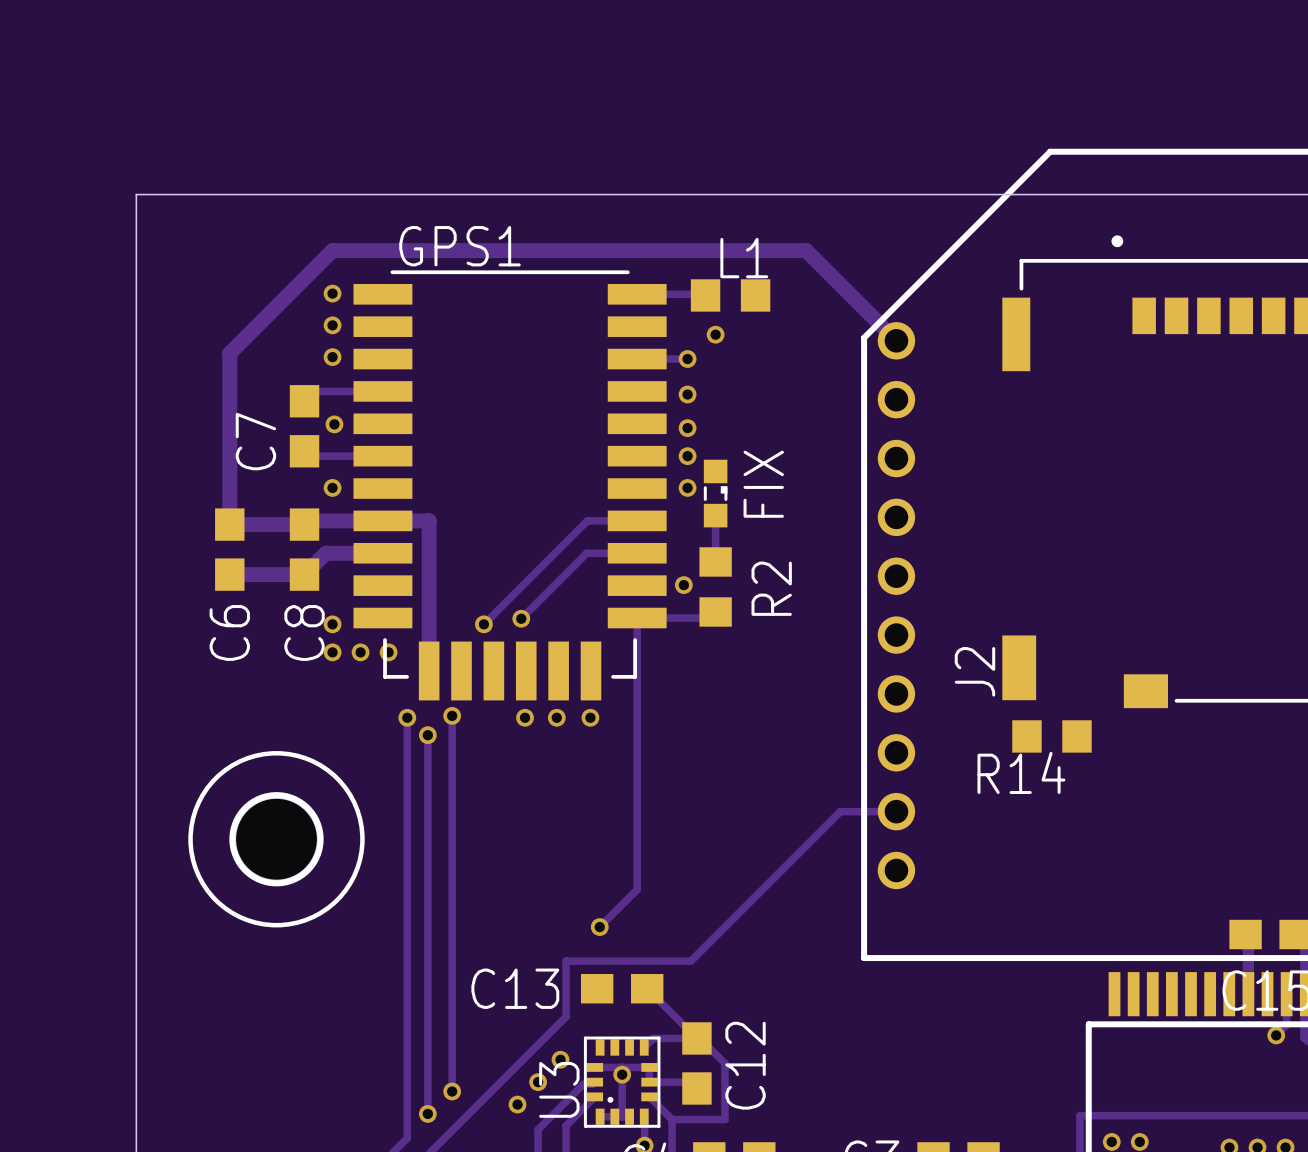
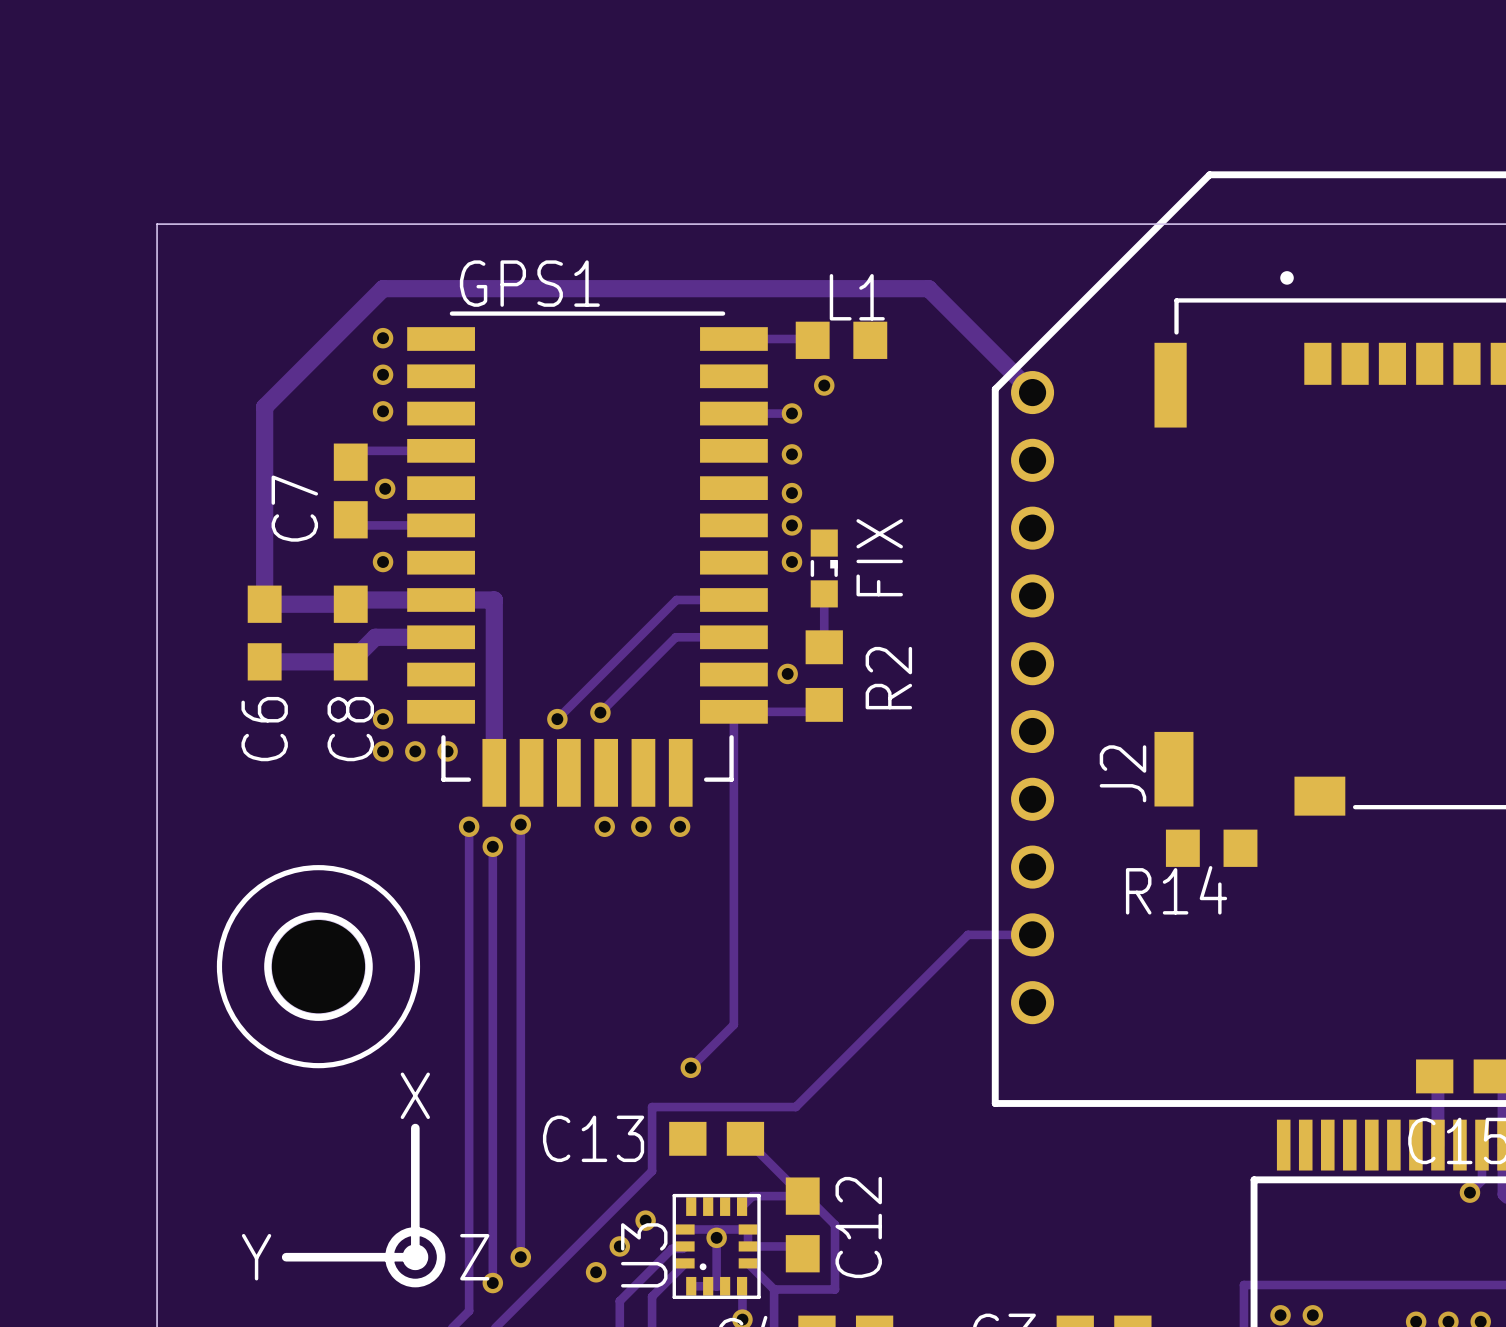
text: none -> X (415, 1095)
line: none -> (415, 1128) (415, 1257) (286, 1257)
drawing: none -> [385, 1227, 446, 1288]
text: none -> Y (256, 1257)
text: none -> Z (474, 1257)

